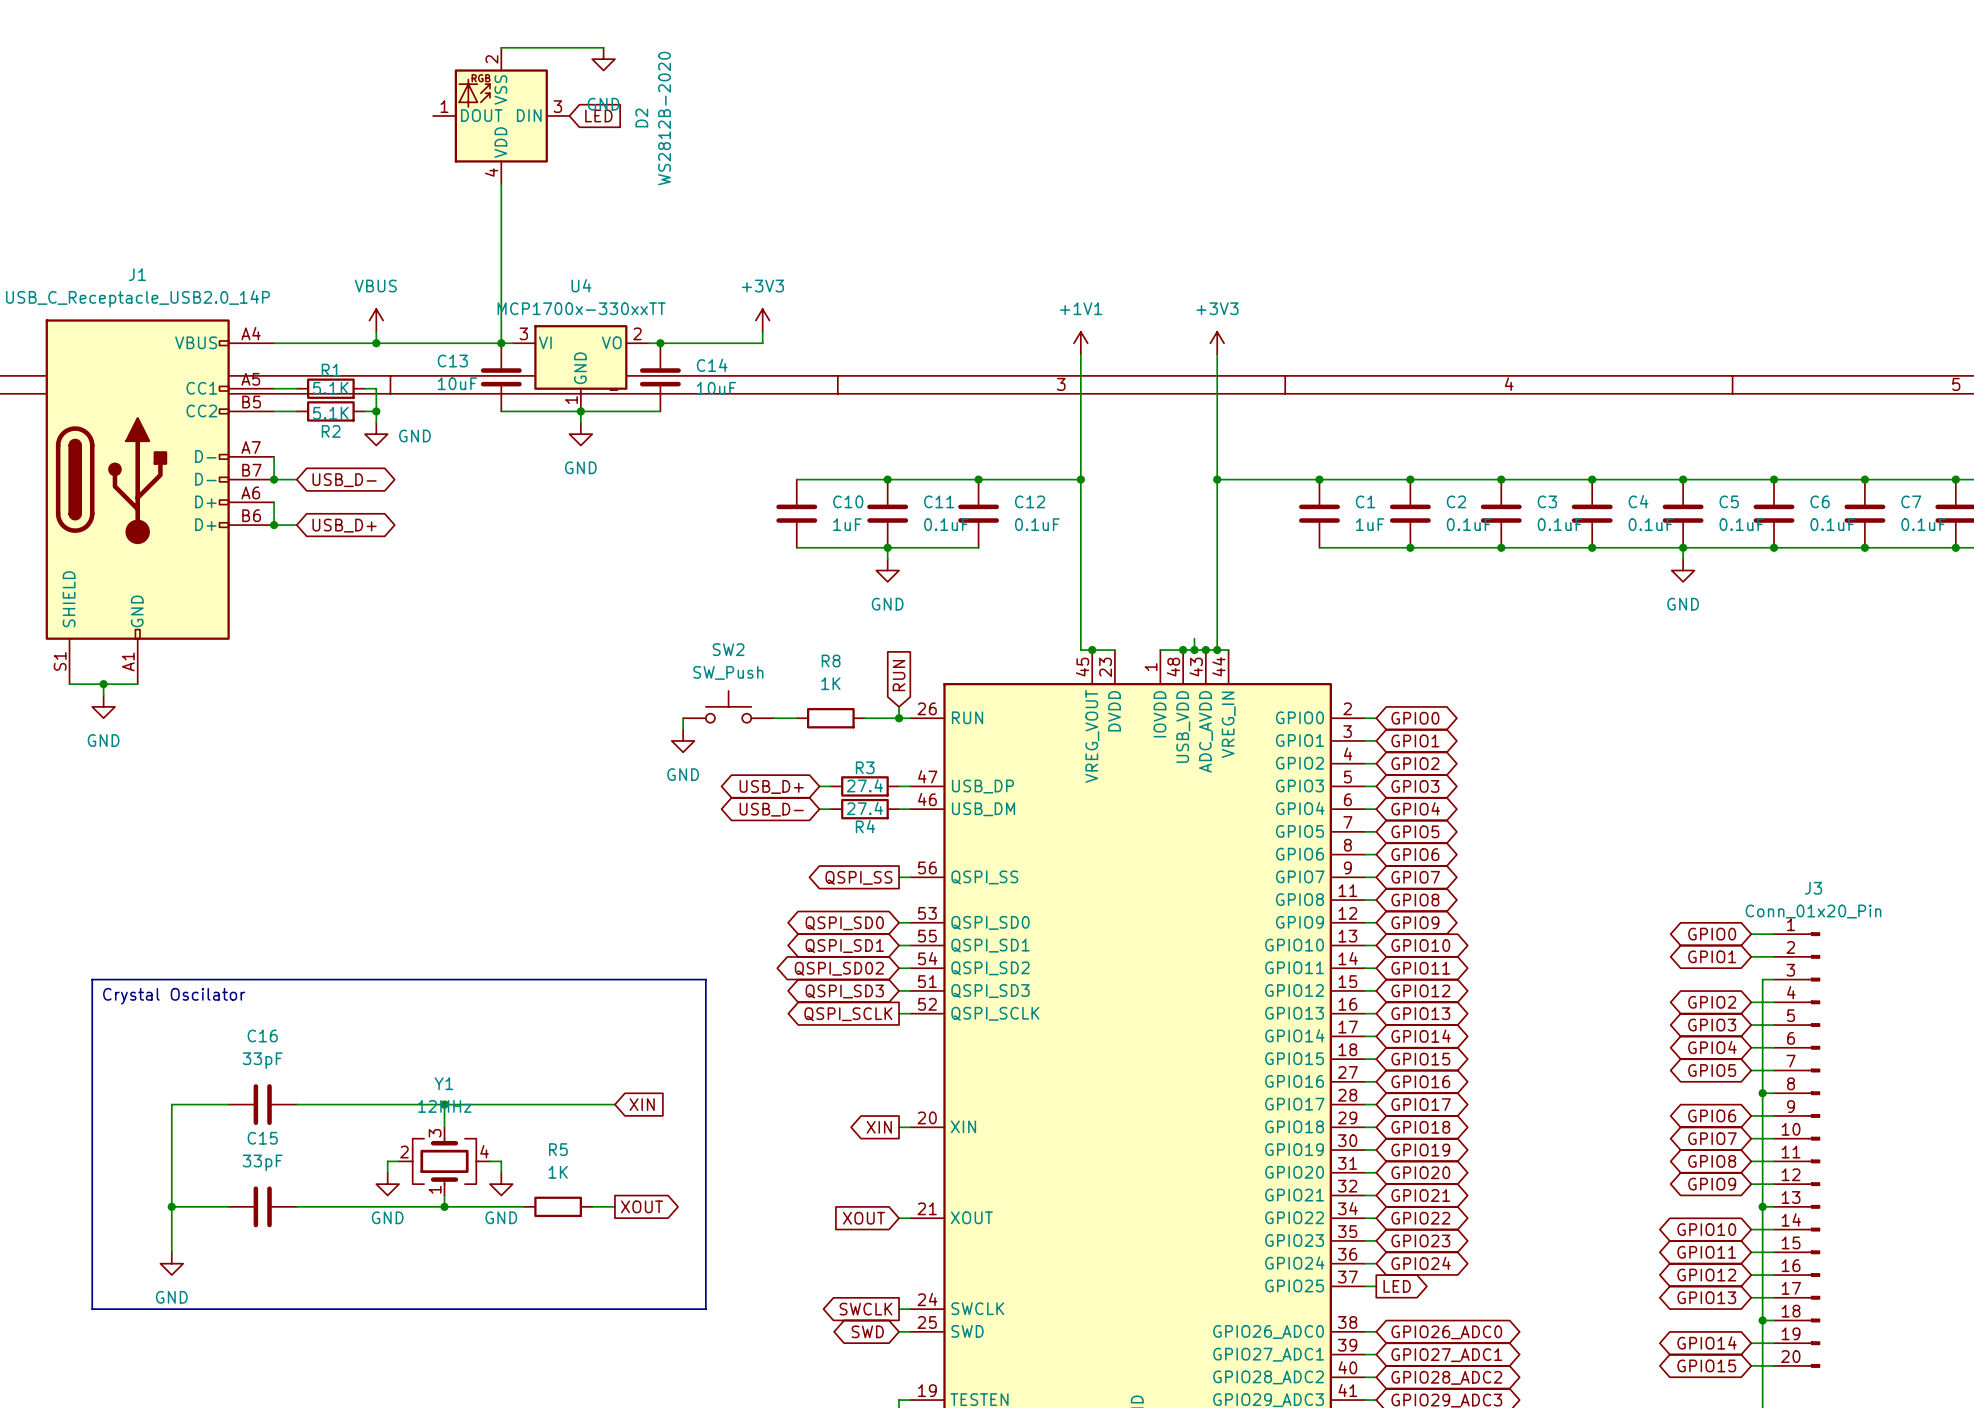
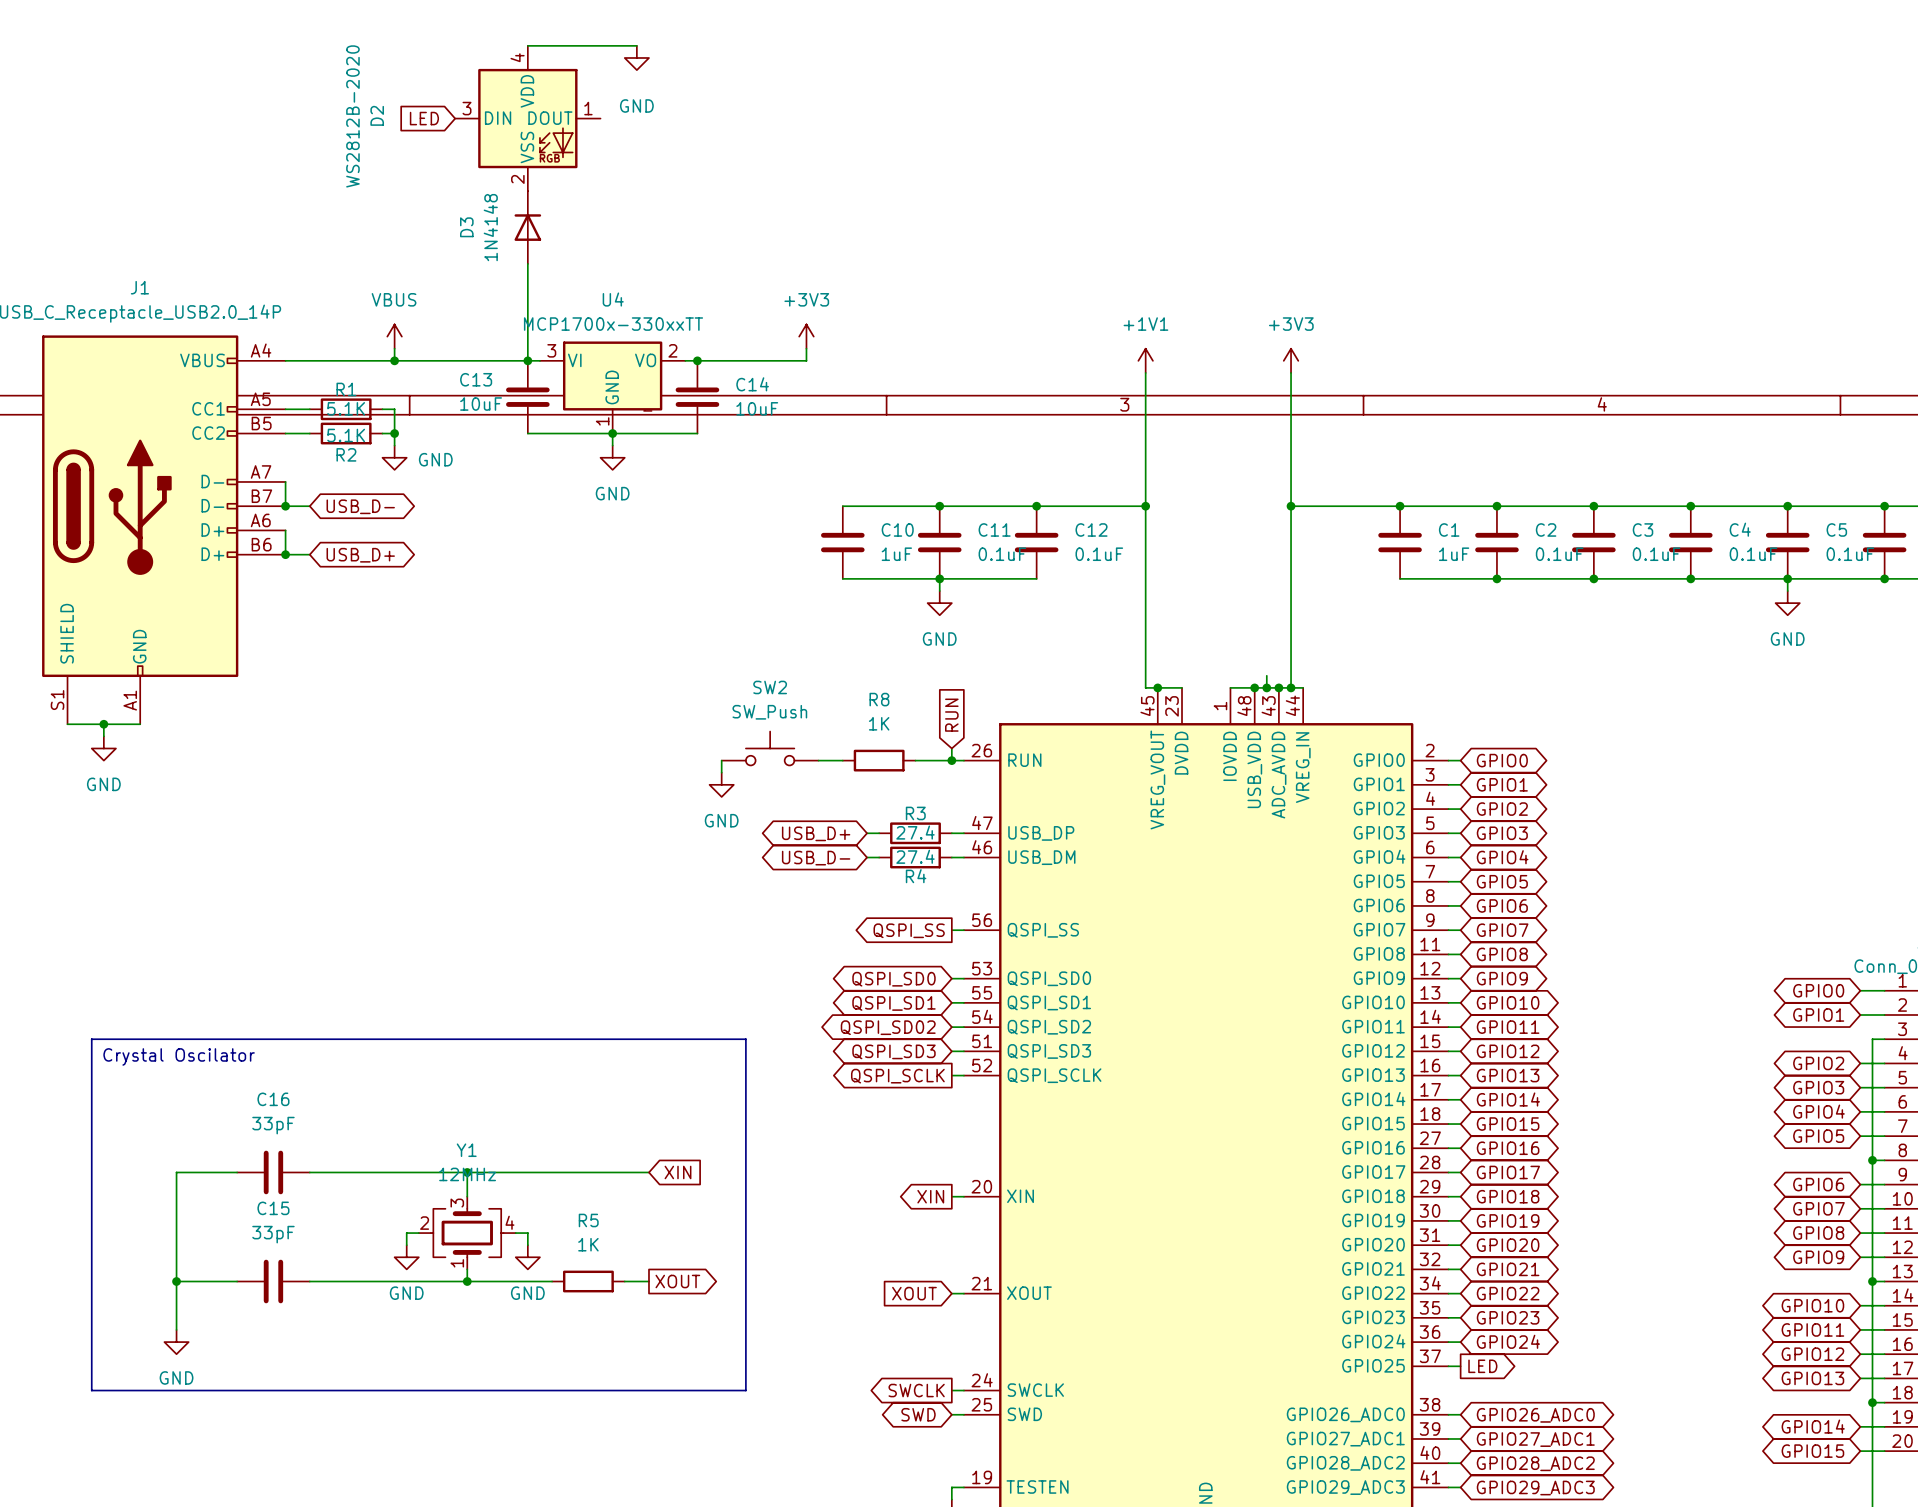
D2 rotation: 0° (501, 115) -> 180° (527, 118)
global label rotation: 0° (598, 115) -> 180° (424, 118)
global label position: LED (598, 115) -> LED (424, 118)
D3: none -> 1N4148 (527, 227)

